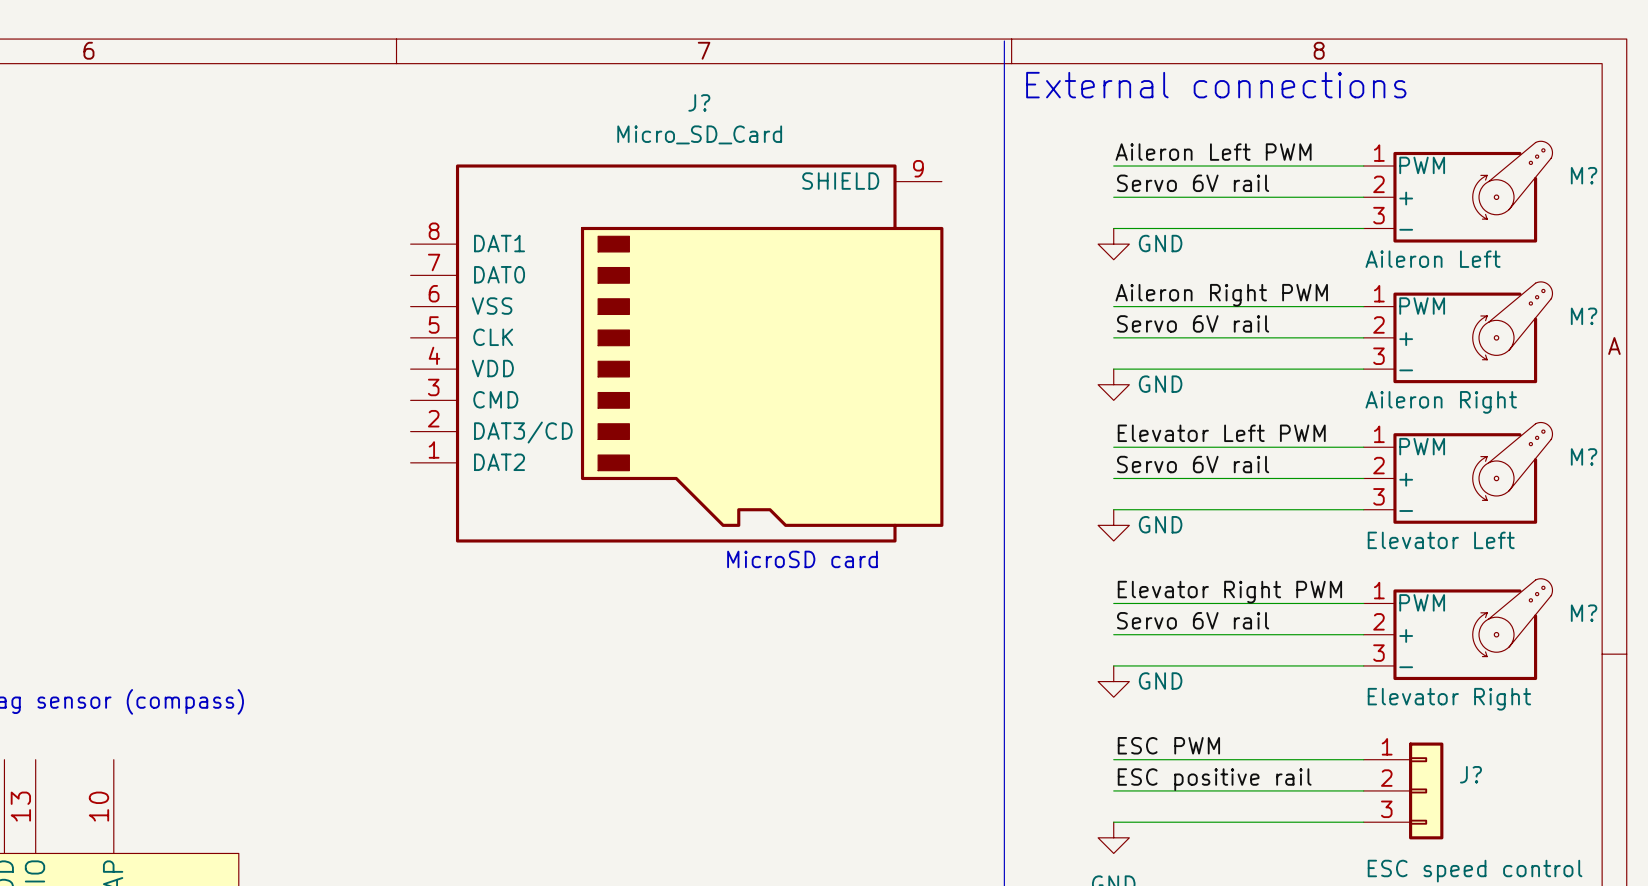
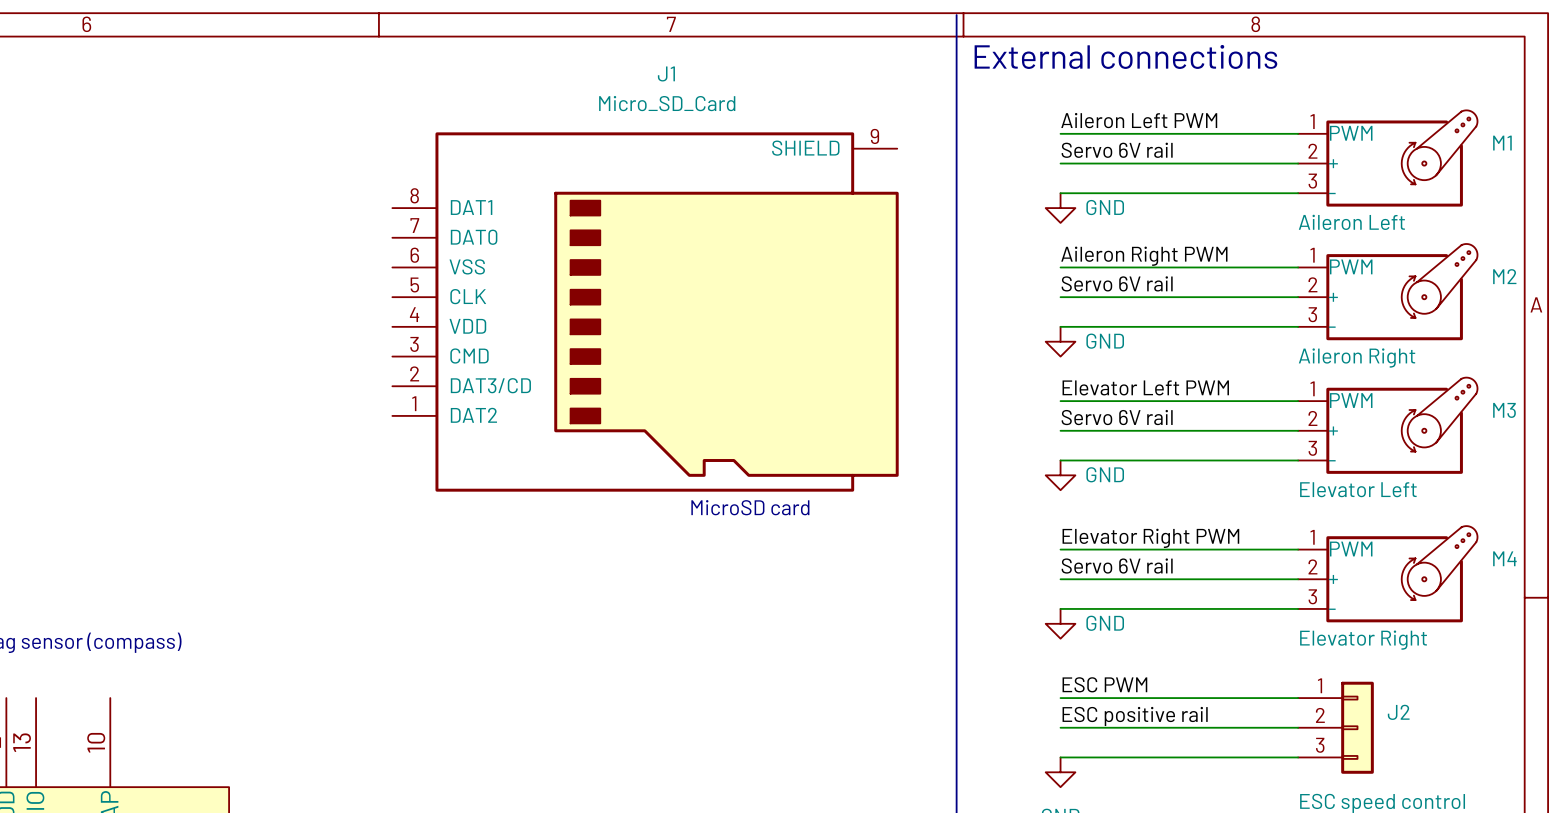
J? name: J? (699, 102) -> J1 (666, 73)
M? name: M? (1584, 175) -> M1 (1502, 143)
M? name: M? (1584, 316) -> M2 (1504, 276)
M? name: M? (1584, 456) -> M3 (1504, 410)
M? name: M? (1584, 613) -> M4 (1504, 558)
J? name: J? (1470, 774) -> J2 (1398, 712)

